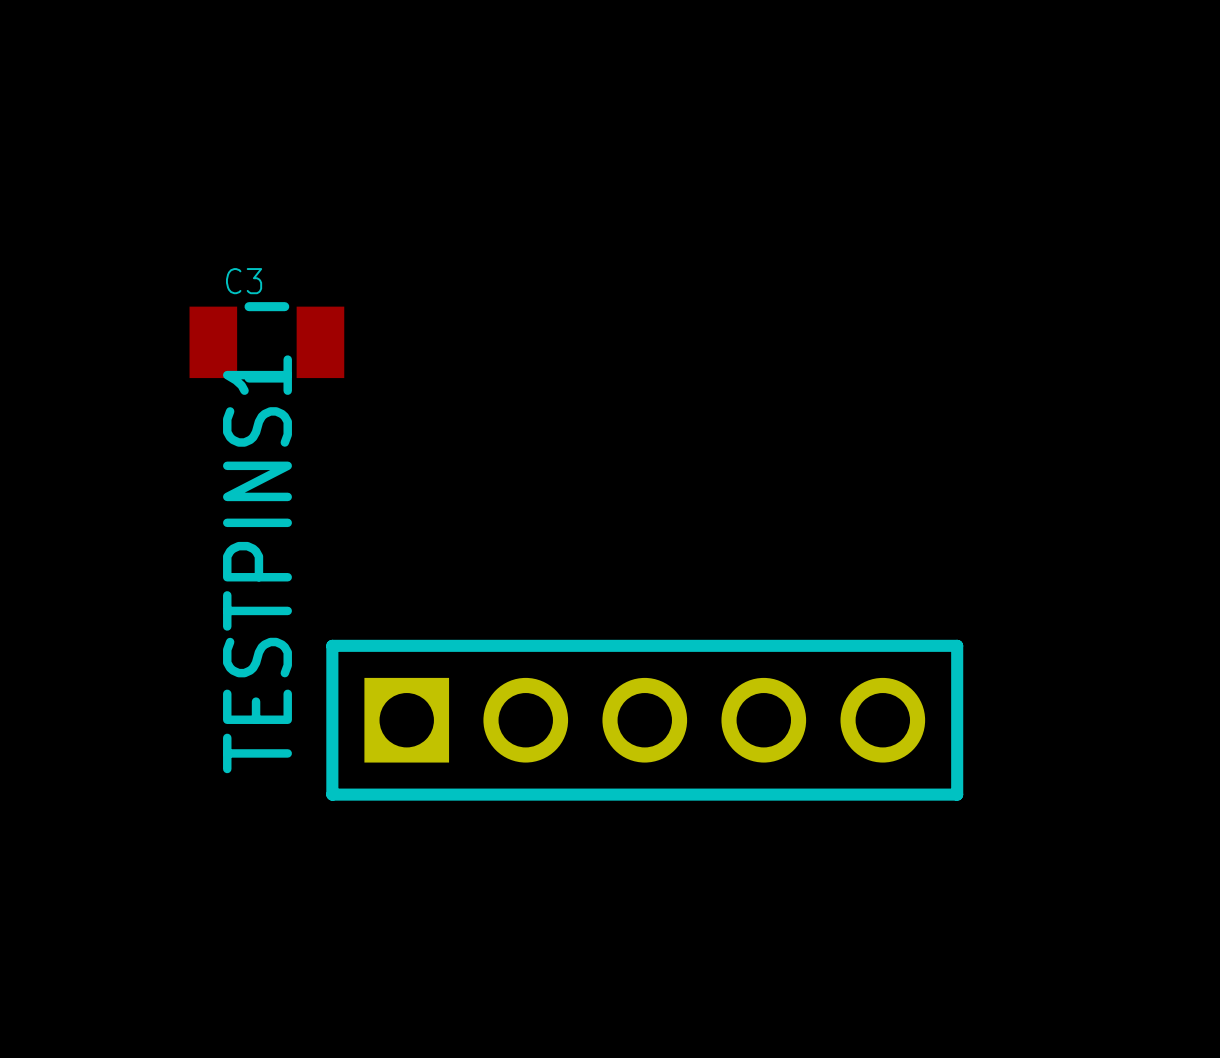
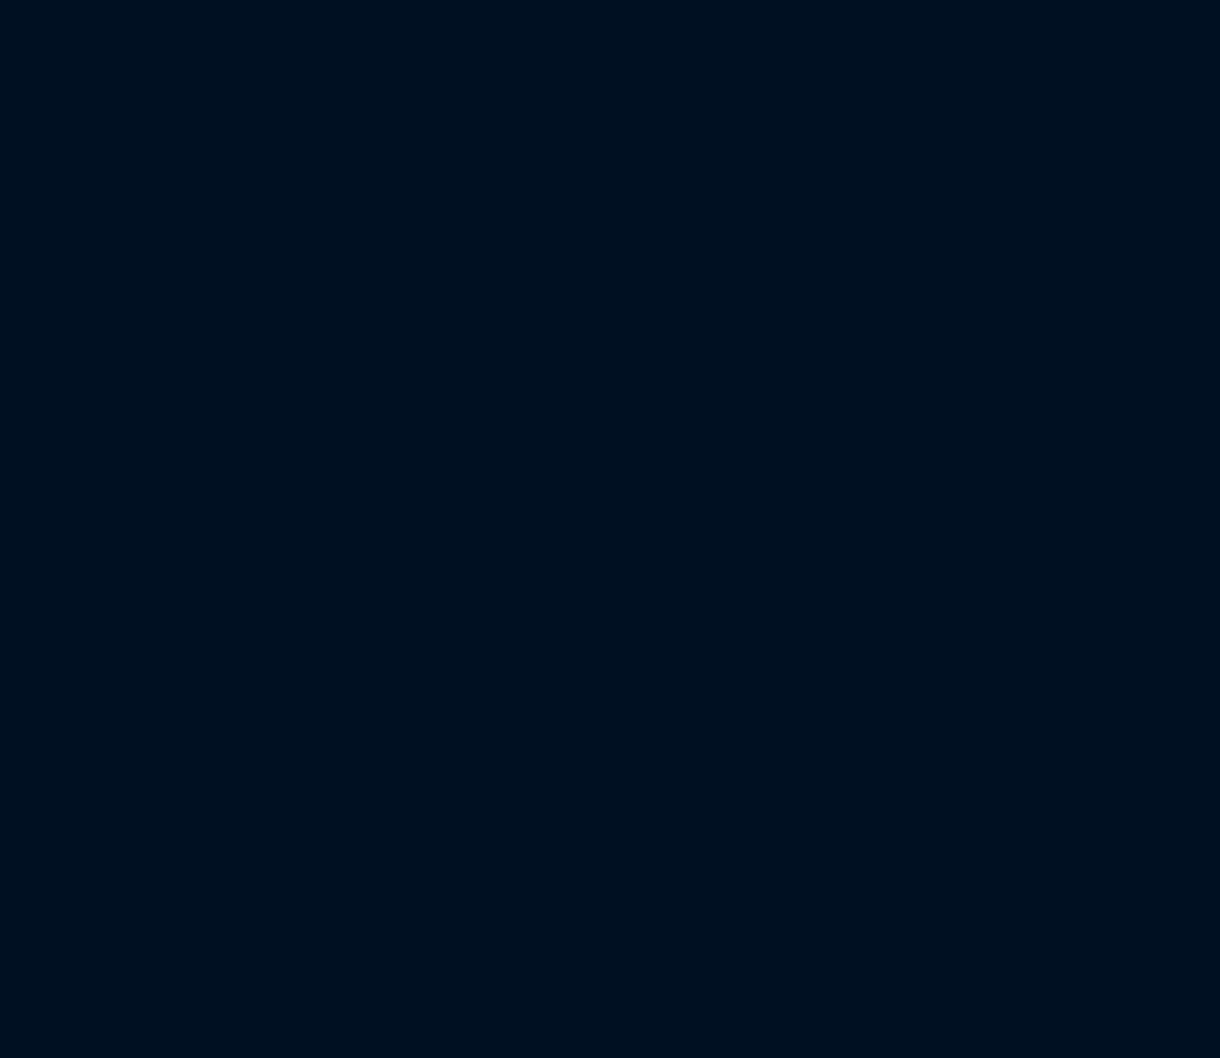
C3: (266, 342) -> none
TESTPINS1: (644, 720) -> none

